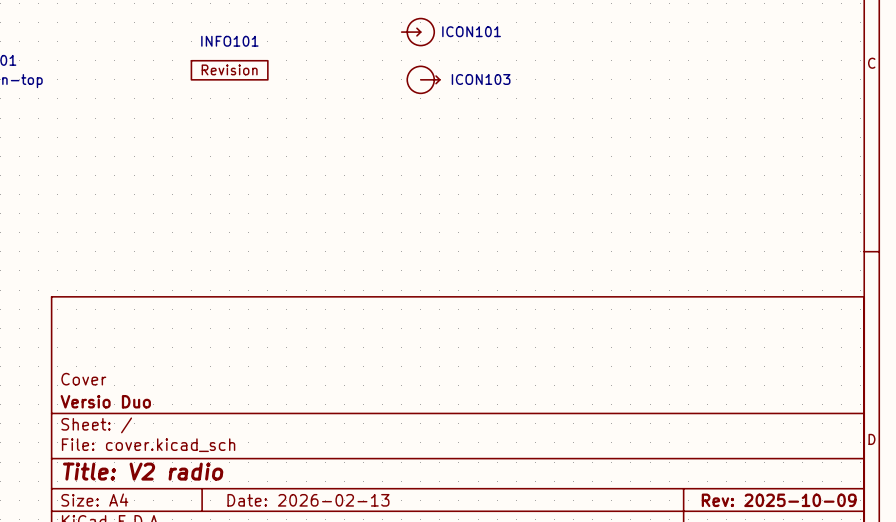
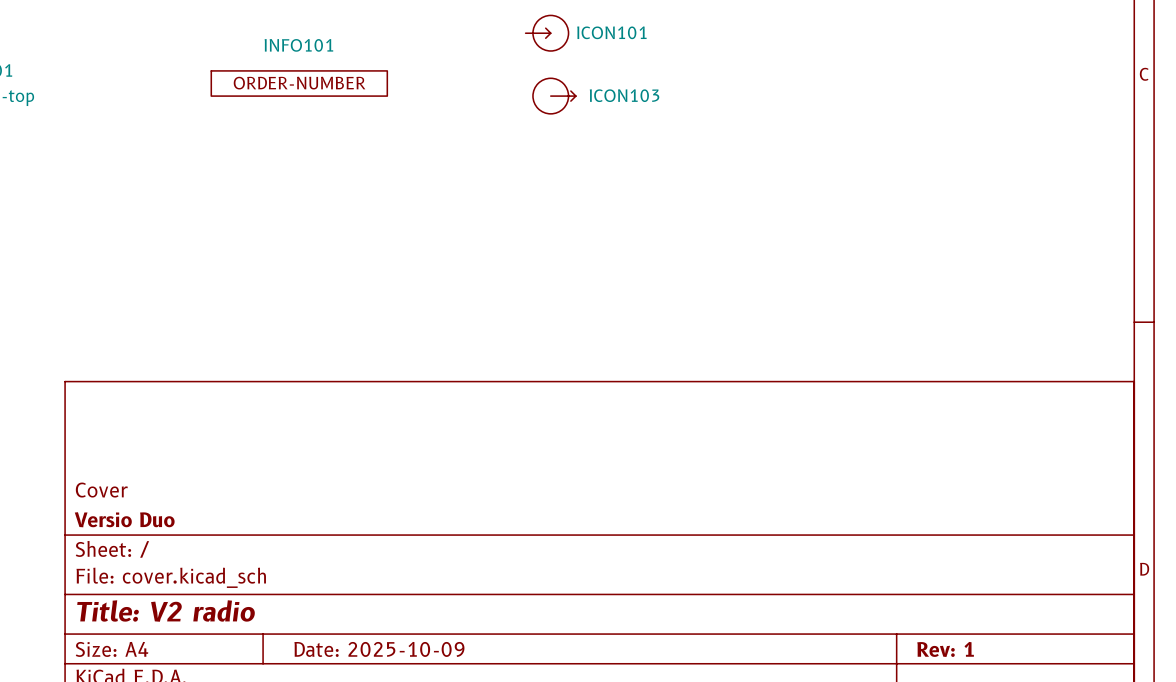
INFO101 symbol: [191, 60, 268, 80] -> [211, 70, 388, 97]
title block: Date: 2026-02-13 (308, 500) -> Date: 2025-10-09 (379, 649)
title block: Rev: 2025-10-09 (779, 500) -> Rev: 1 (945, 649)

